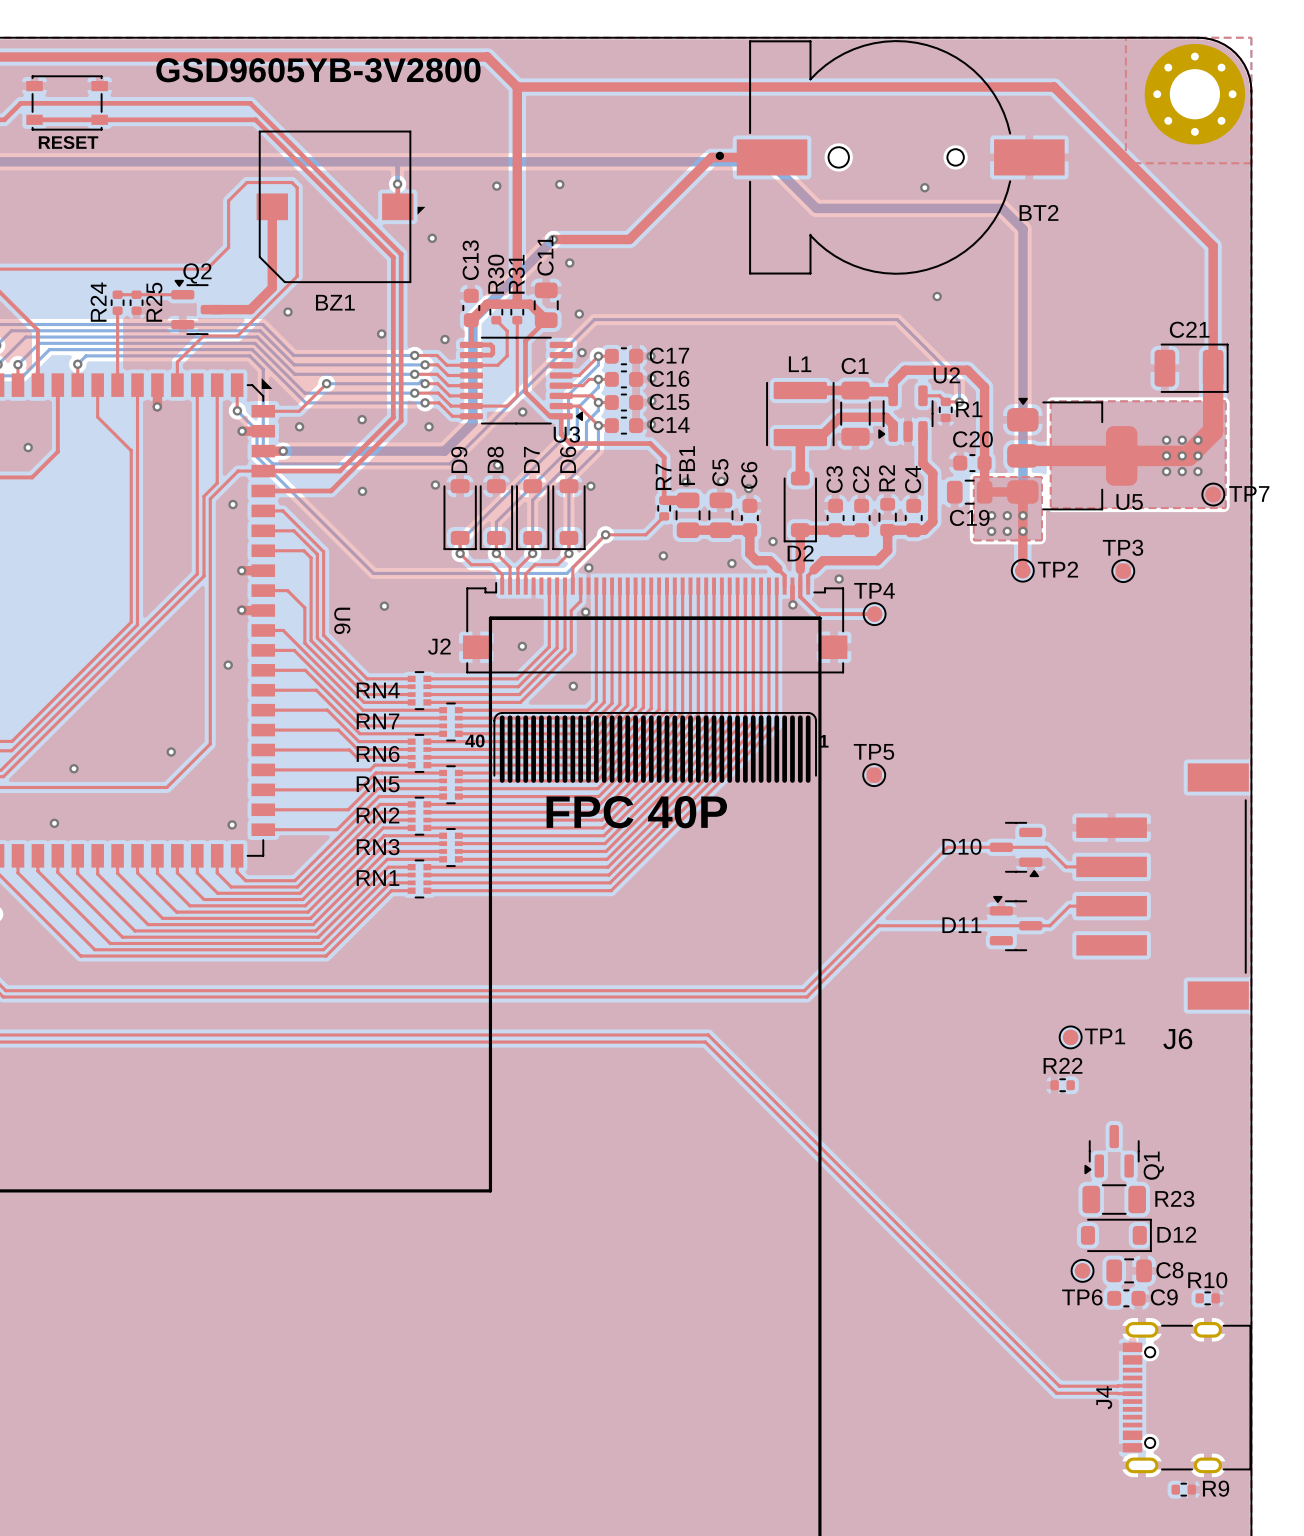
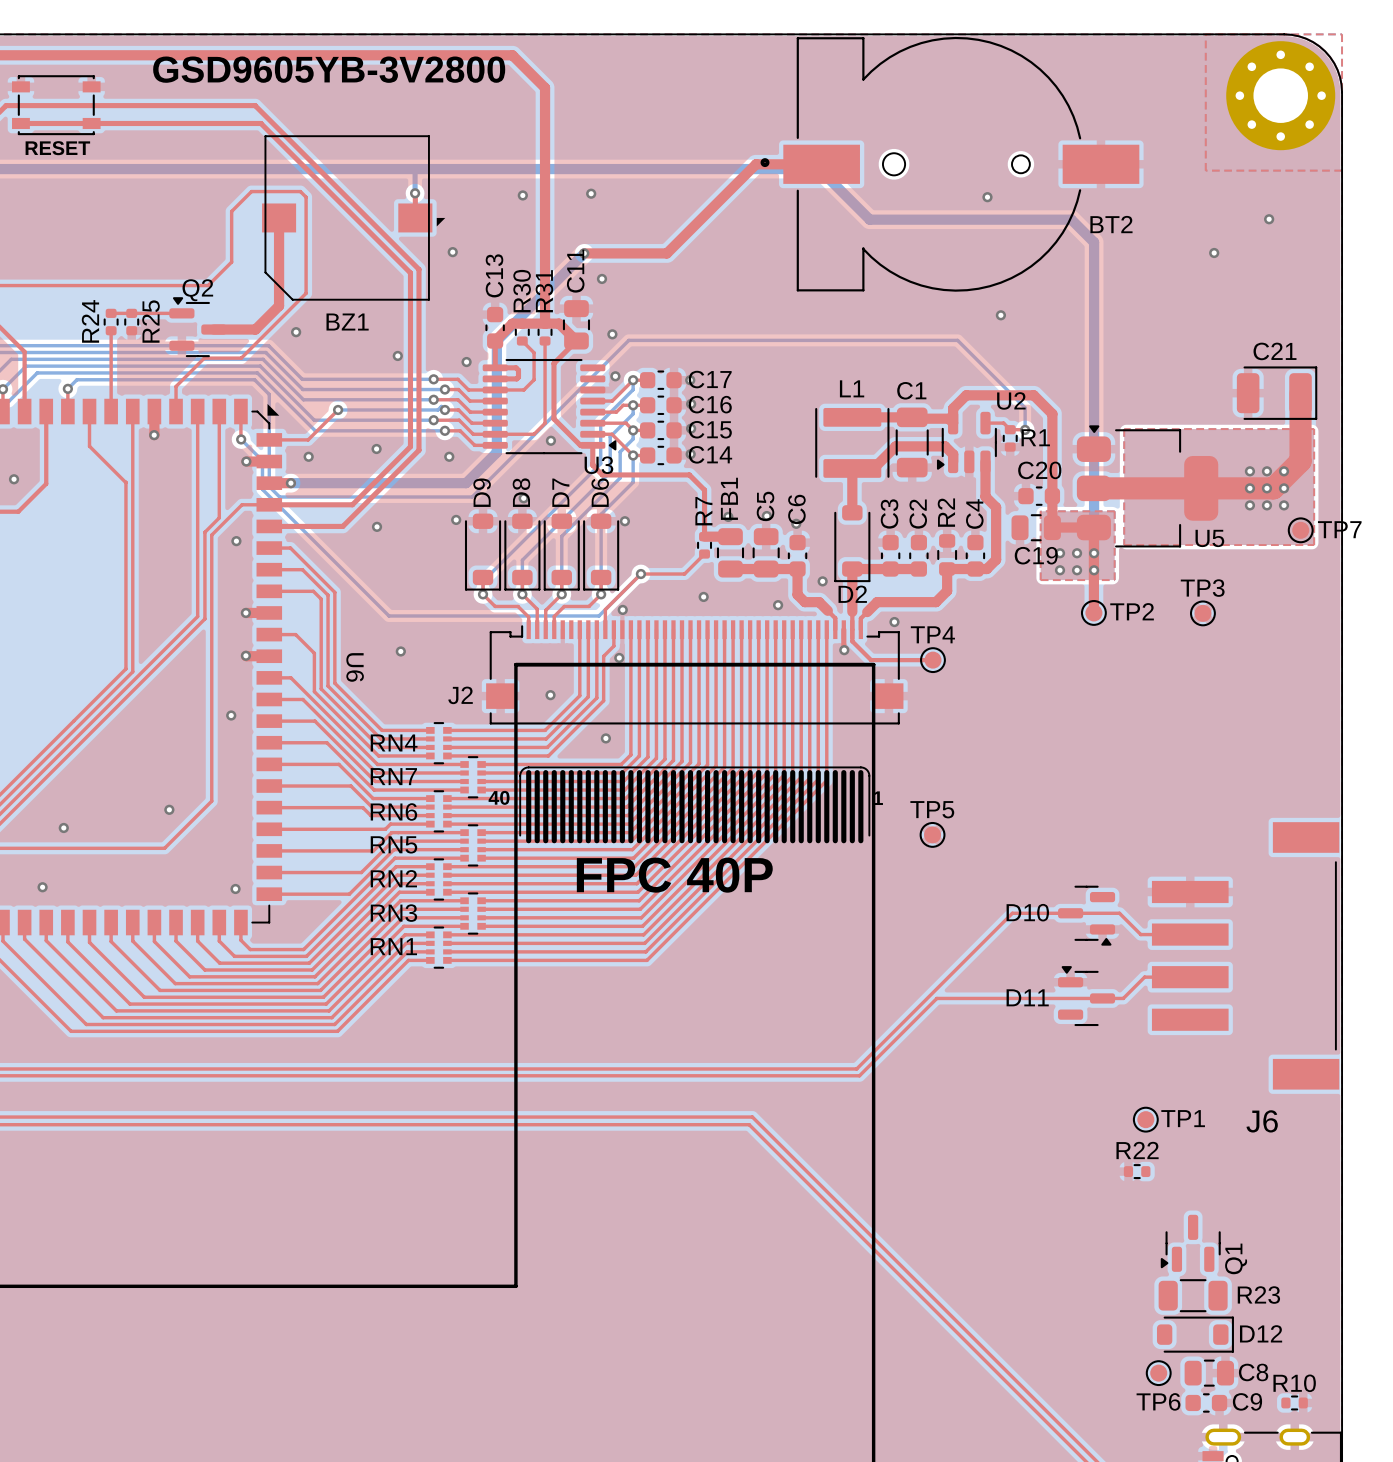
top track: (517, 87) (1054, 87) (1213, 246) (1213, 368) -> none
via: none -> (1269, 219)
via: none -> (1214, 252)

